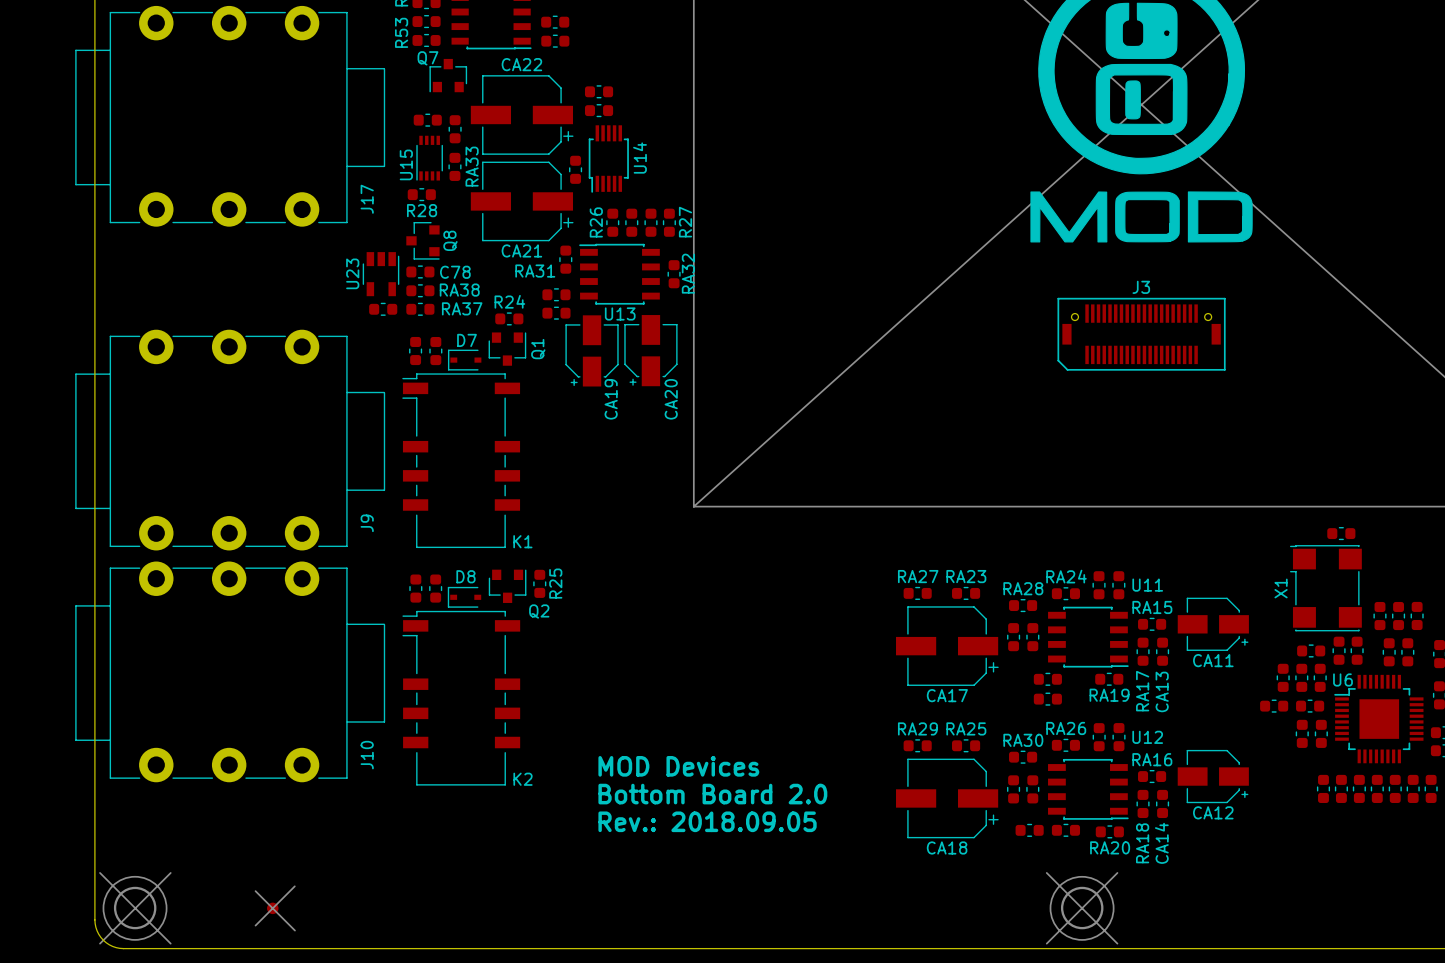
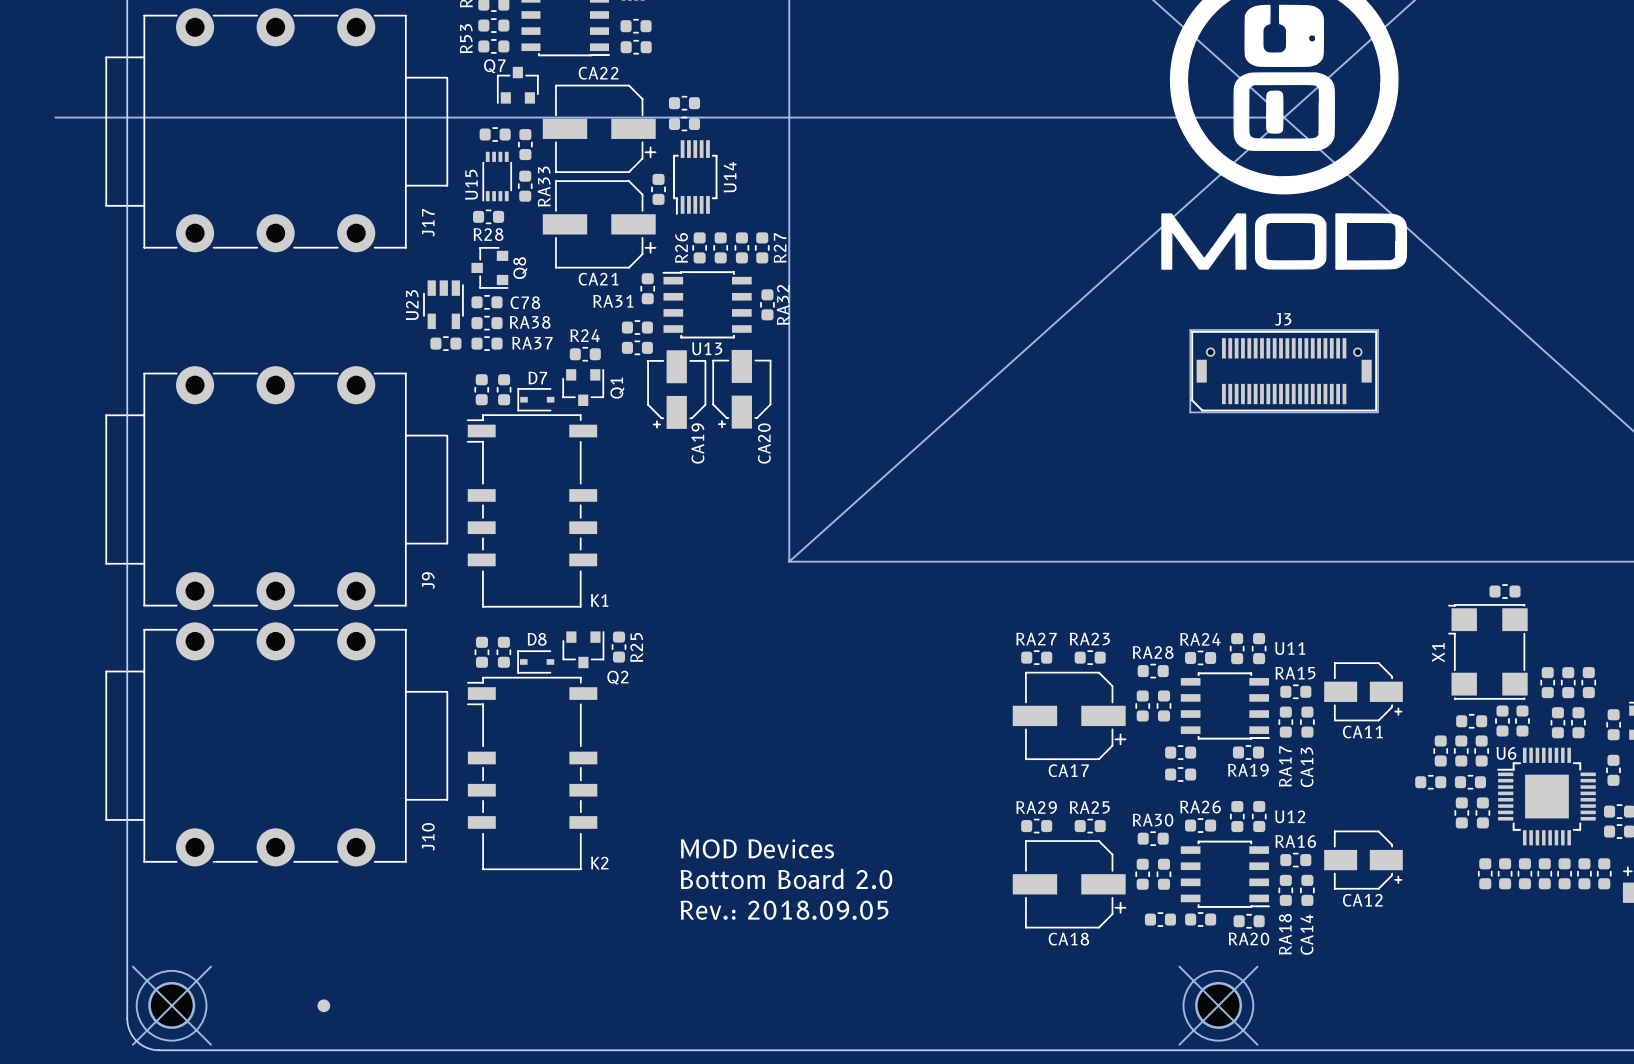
line: none -> (55, 117) (1282, 117)
line: none -> (1190, 329) (1190, 412) (1378, 412) (1378, 329) (1190, 329)
line: (294, 886) (255, 925) -> none
line: (255, 891) (294, 930) -> none

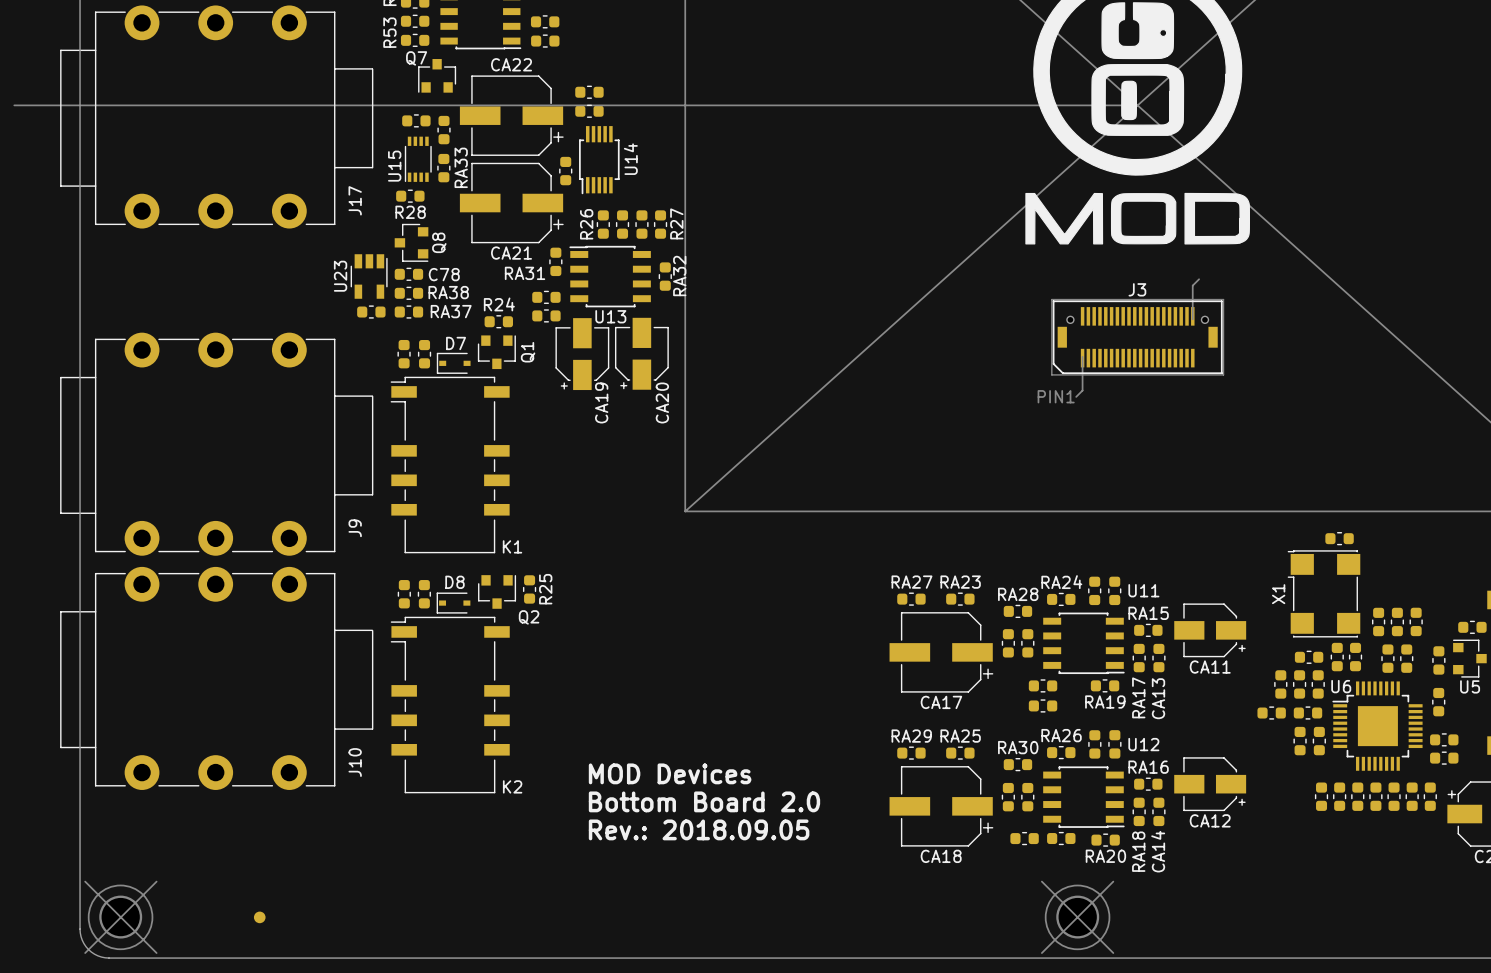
line: none -> (1199, 279) (1192, 285) (1192, 319)
line: none -> (1082, 356) (1082, 390) (1076, 396)
text: none -> PIN1 (1056, 396)

